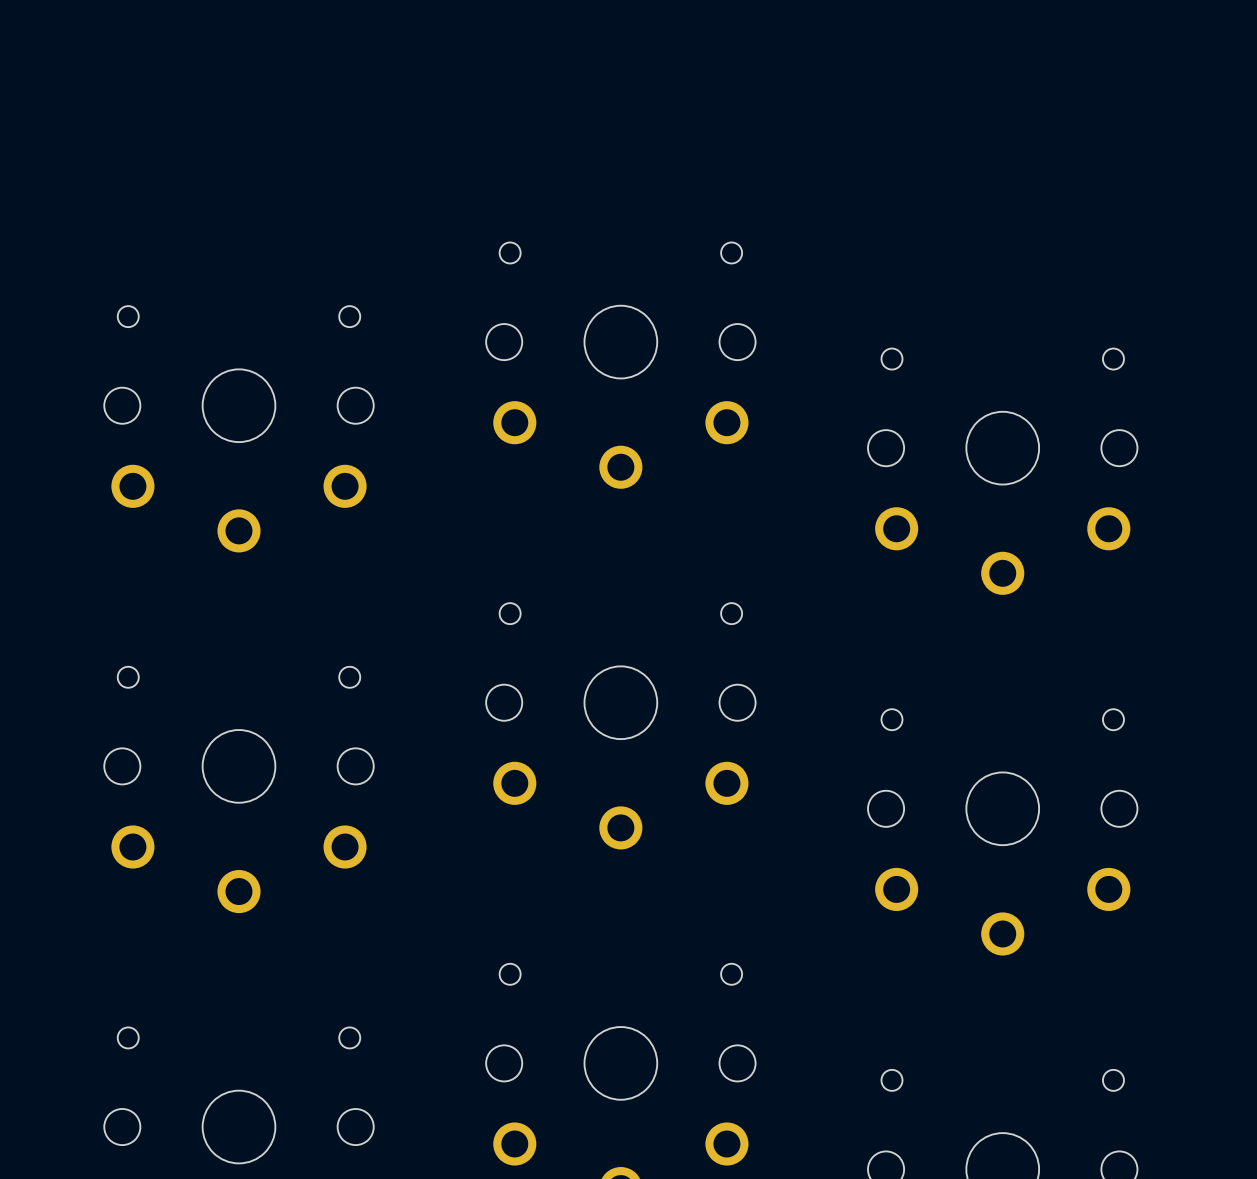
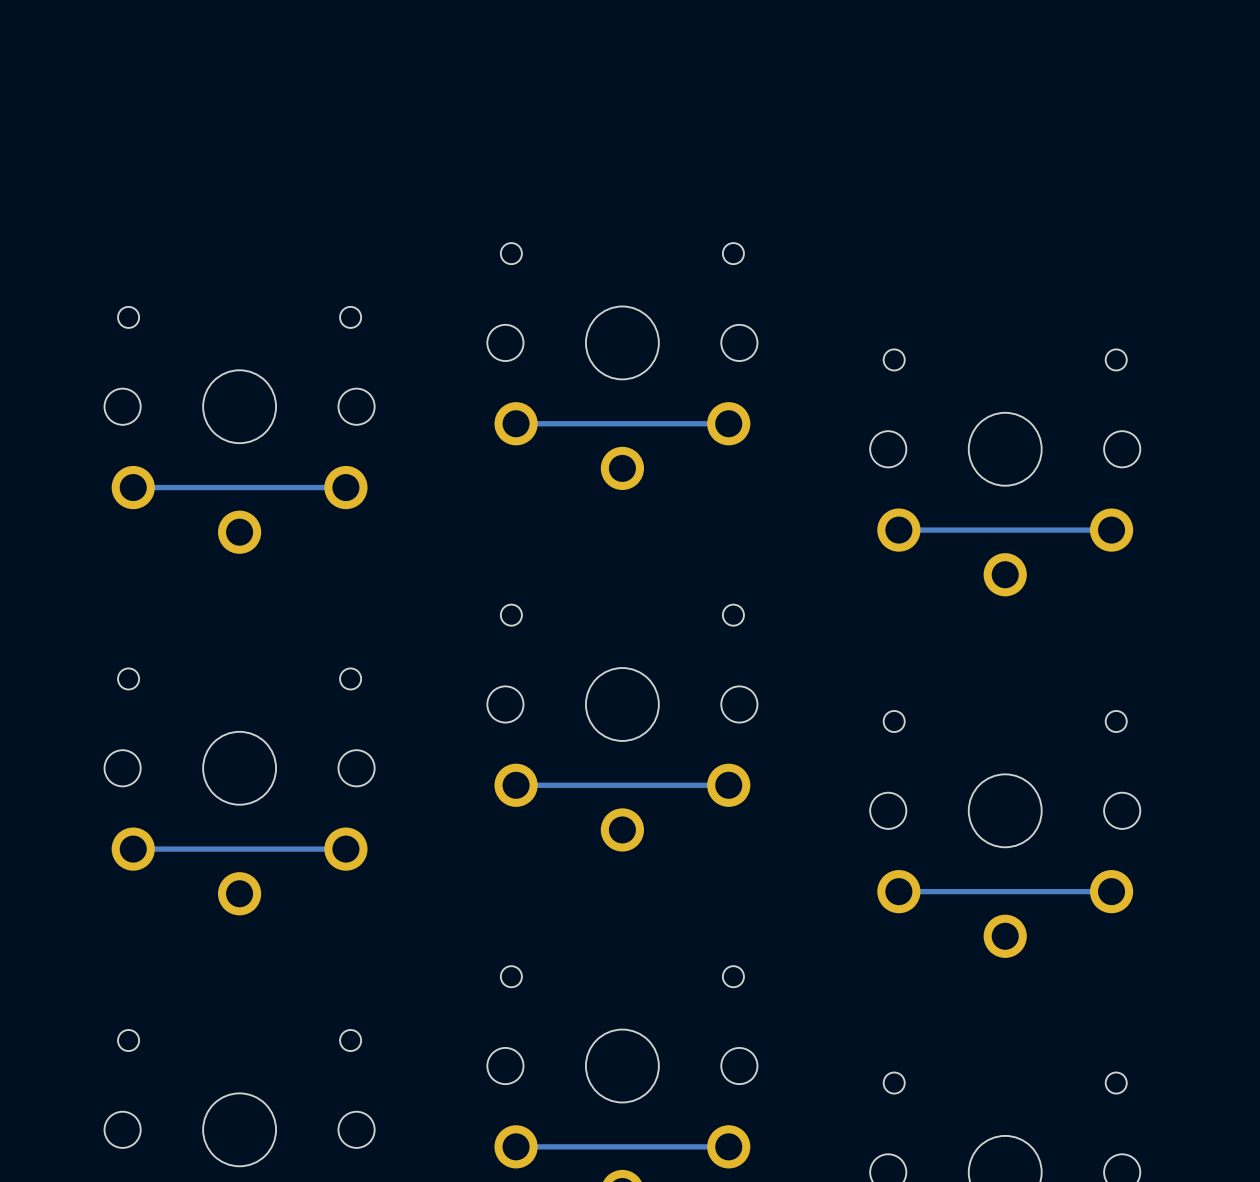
track: none -> (728, 423) (516, 423)
track: none -> (345, 487) (133, 487)
track: none -> (1111, 530) (898, 530)
track: none -> (728, 785) (516, 785)
track: none -> (345, 849) (133, 849)
track: none -> (1111, 891) (898, 891)
track: none -> (728, 1146) (516, 1146)

